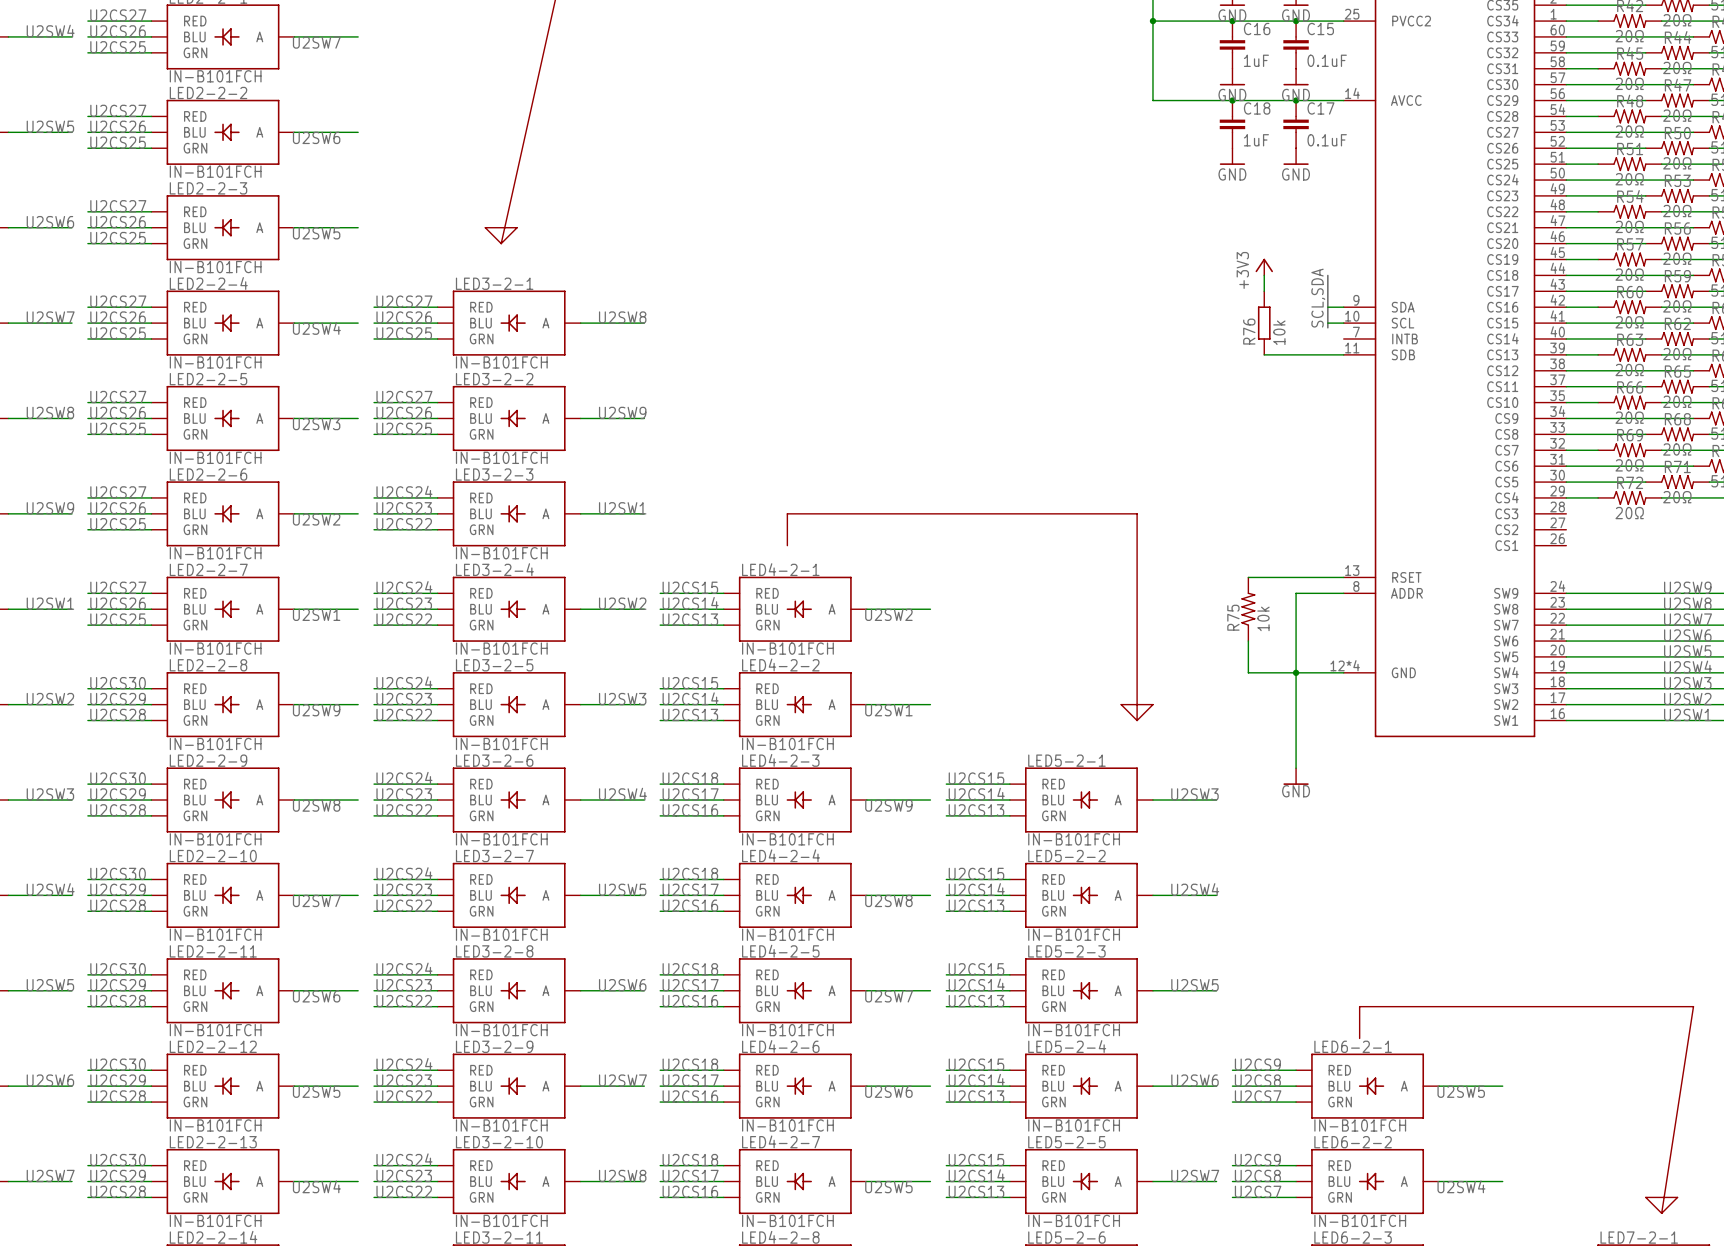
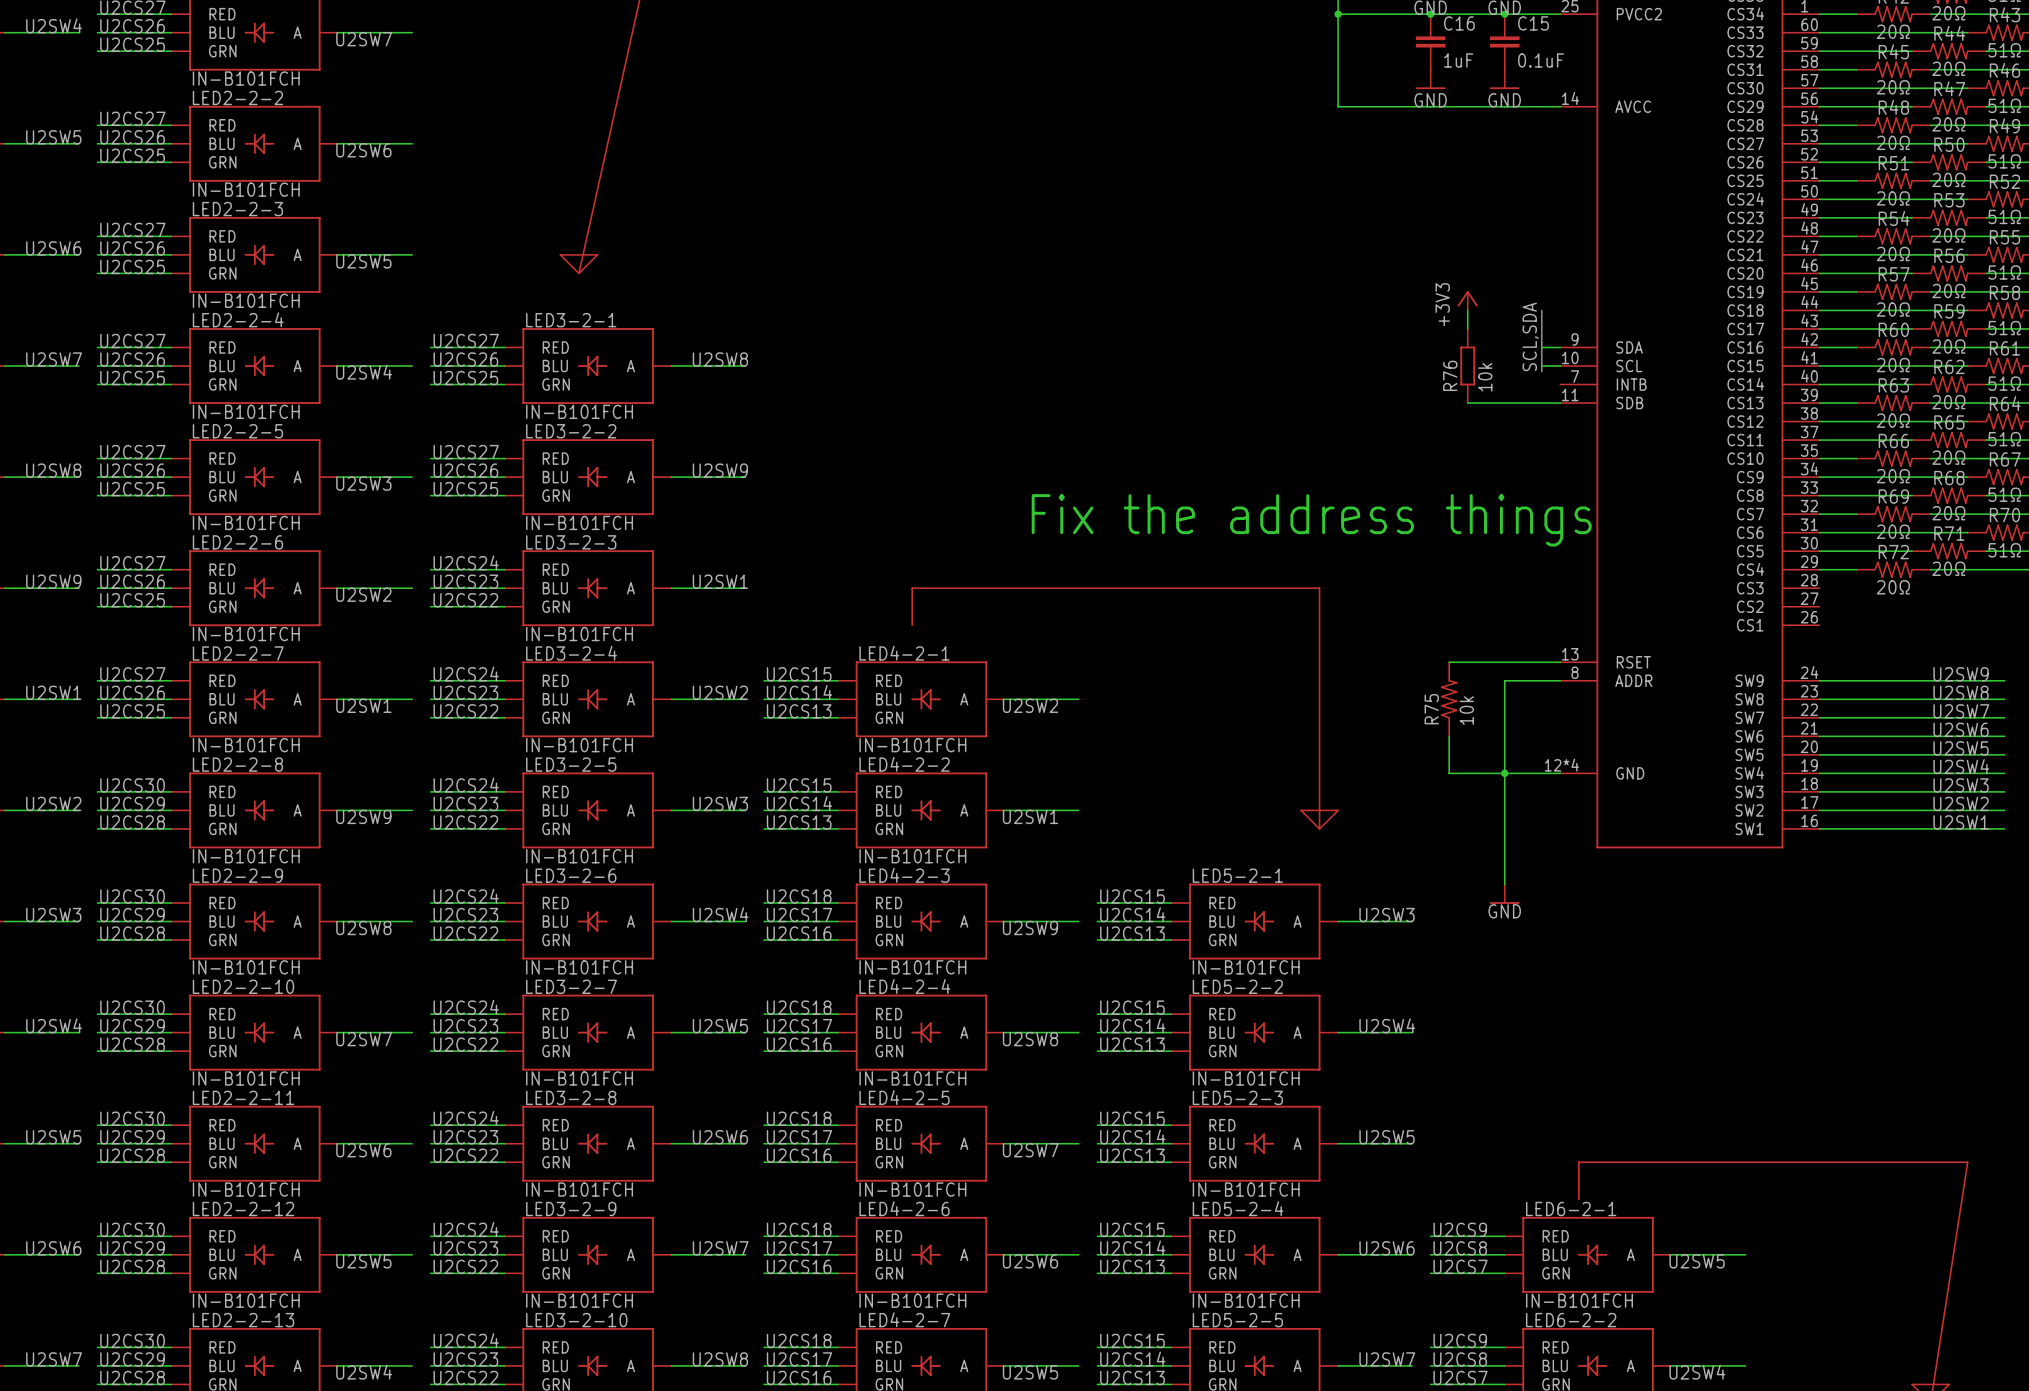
junction: (1232, 100) -> none
junction: (1296, 100) -> none
C18: 1uF (1232, 124) -> none
C17: 0.1uF (1296, 124) -> none
power symbol: GND (1232, 156) -> none
power symbol: GND (1296, 156) -> none
text: none -> Fix the address things (1311, 520)

